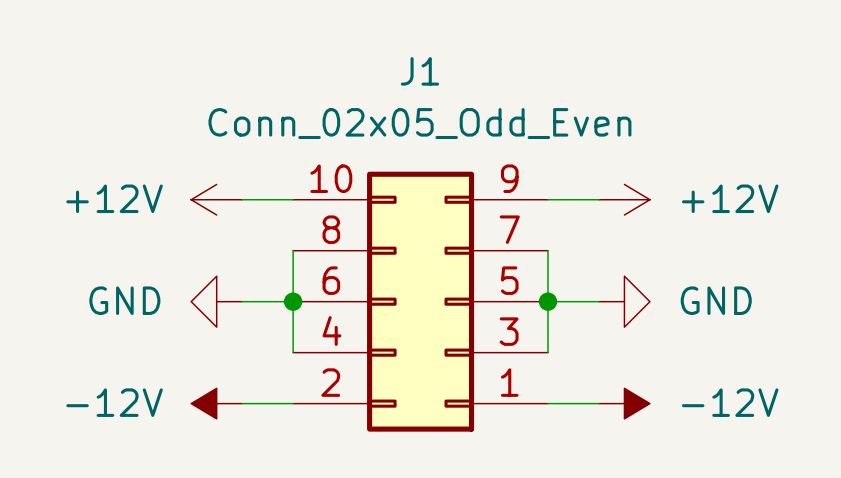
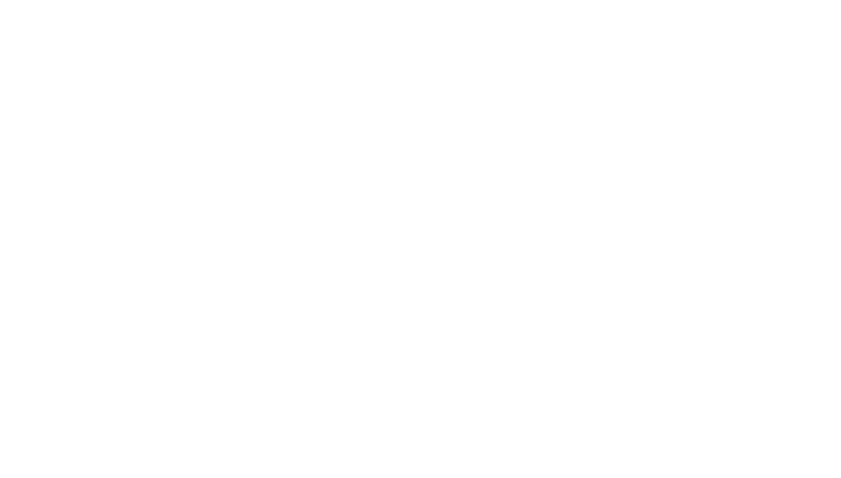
power symbol: +12V (216, 199) -> none
wire: (242, 199) (293, 199) -> none
wire: (547, 199) (598, 199) -> none
power symbol: +12V (624, 199) -> none
wire: (293, 250) (293, 352) -> none
wire: (547, 250) (547, 352) -> none
power symbol: GND (216, 301) -> none
wire: (242, 301) (293, 301) -> none
junction: (293, 301) -> none
J1: Conn_02x05_Odd_Even (420, 301) -> none
wire: (547, 301) (598, 301) -> none
junction: (547, 301) -> none
power symbol: GND (624, 301) -> none
power symbol: -12V (216, 403) -> none
wire: (242, 403) (293, 403) -> none
wire: (547, 403) (598, 403) -> none
power symbol: -12V (624, 403) -> none

